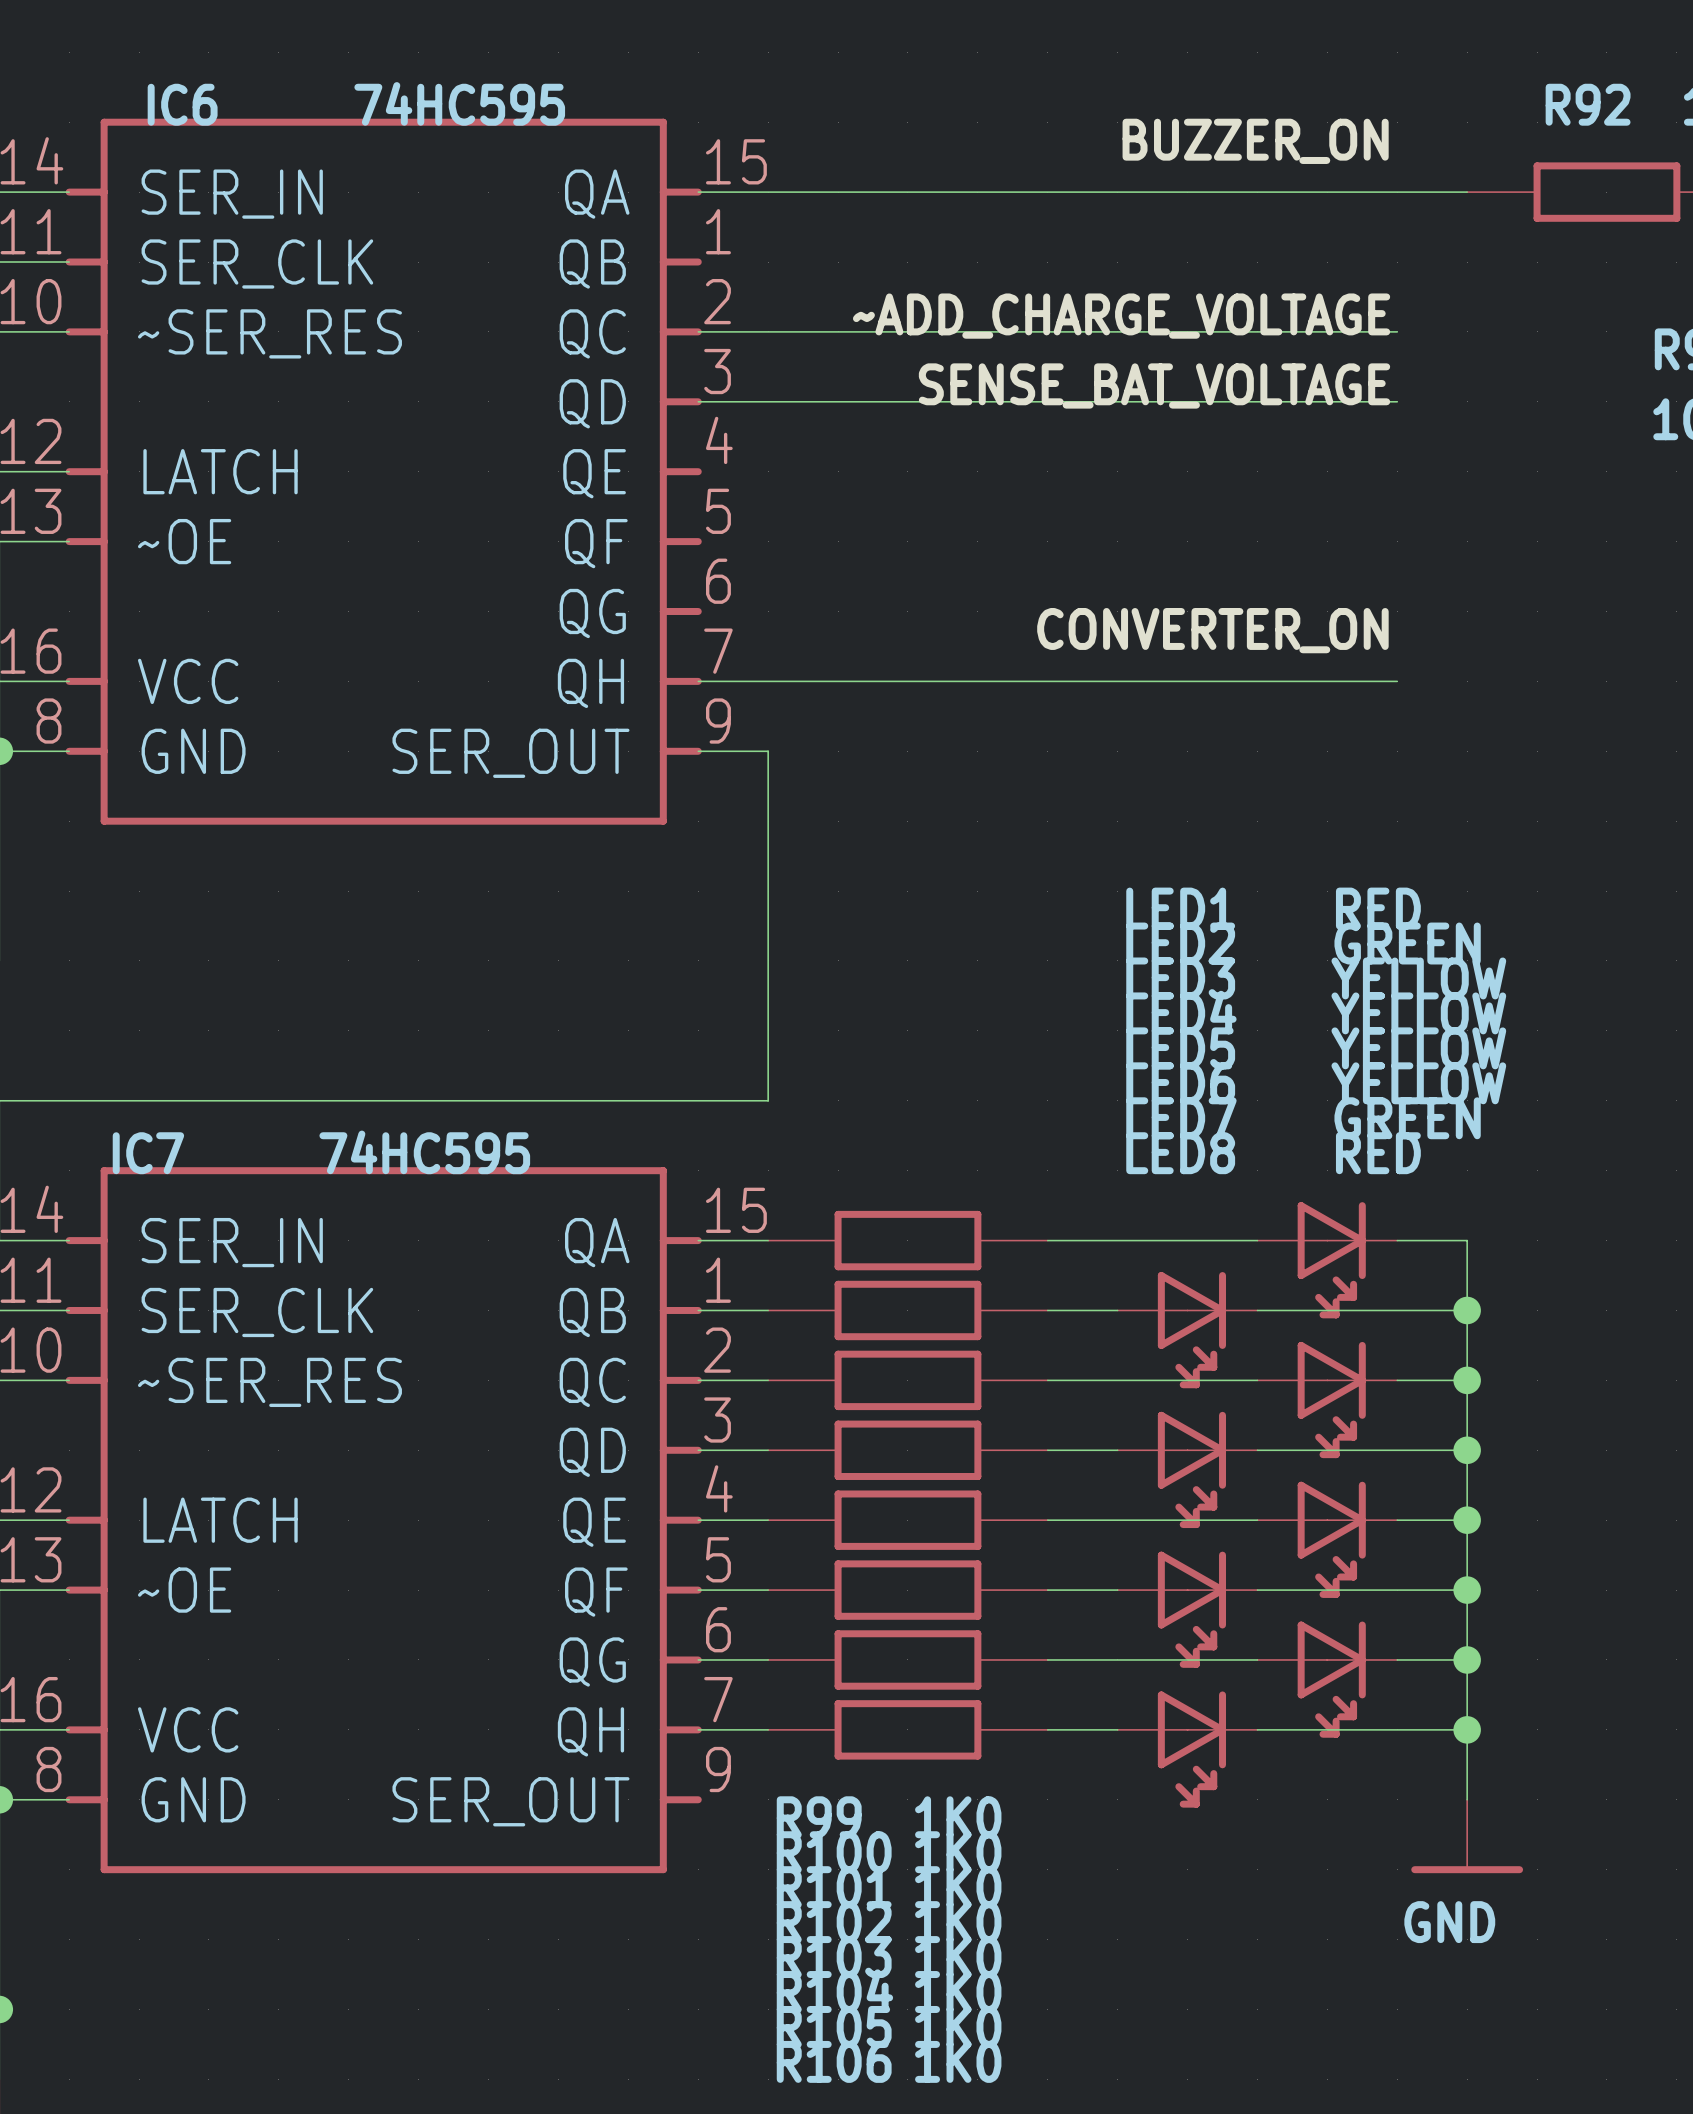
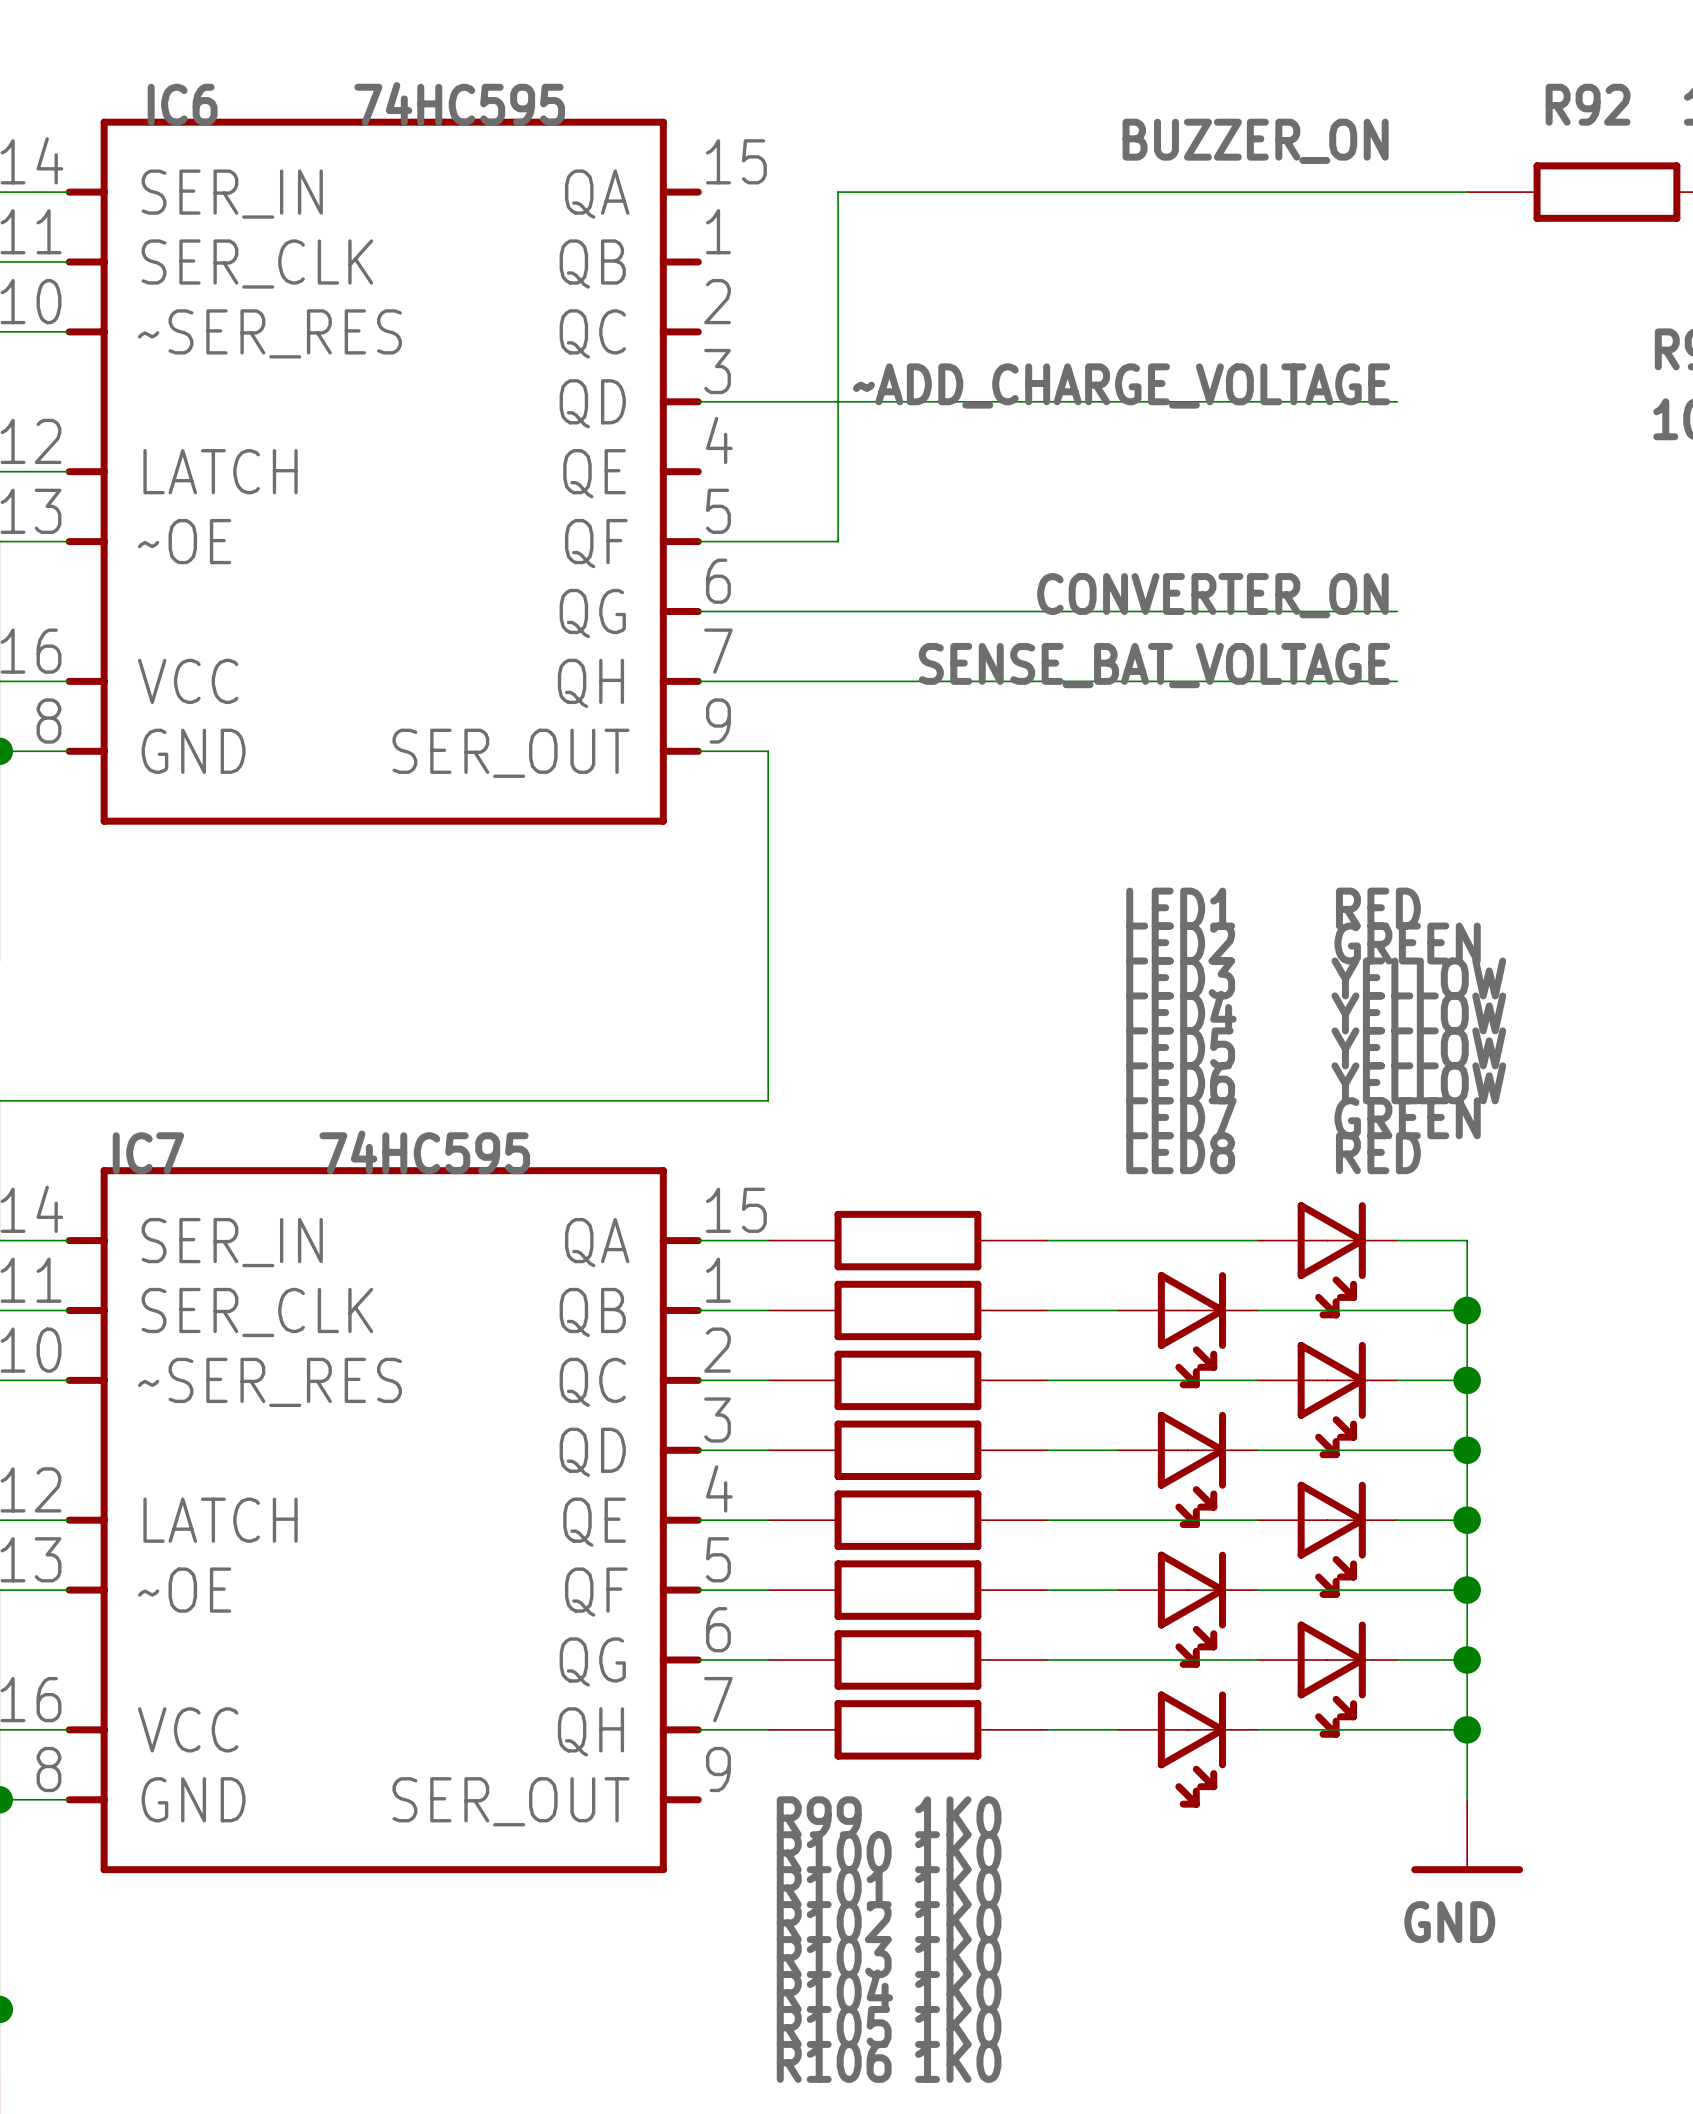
wire: (698, 192) (838, 192) -> (698, 541) (838, 541) (838, 192)
label: ~ADD_CHARGE_VOLTAGE (1121, 316) -> none
wire: (698, 331) (1397, 331) -> (698, 611) (1397, 611)
label: SENSE_BAT_VOLTAGE (1154, 385) -> ~ADD_CHARGE_VOLTAGE (1121, 385)
label position: CONVERTER_ON (1212, 630) -> CONVERTER_ON (1212, 595)
label: none -> SENSE_BAT_VOLTAGE (1154, 665)

